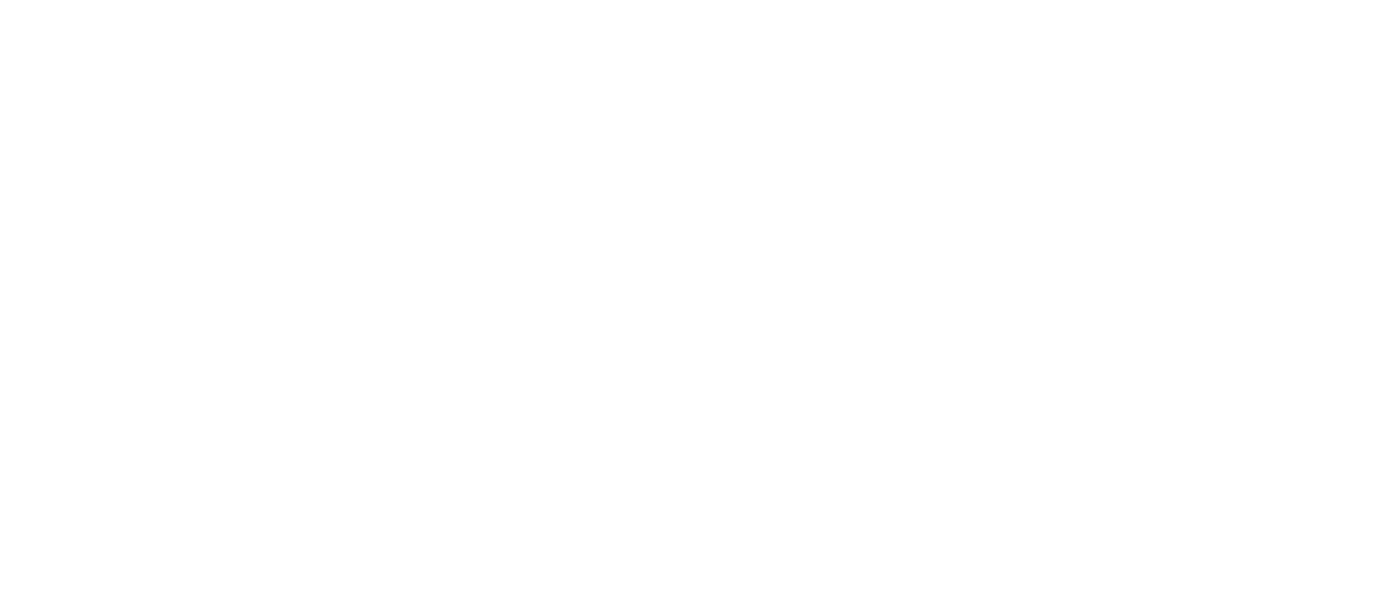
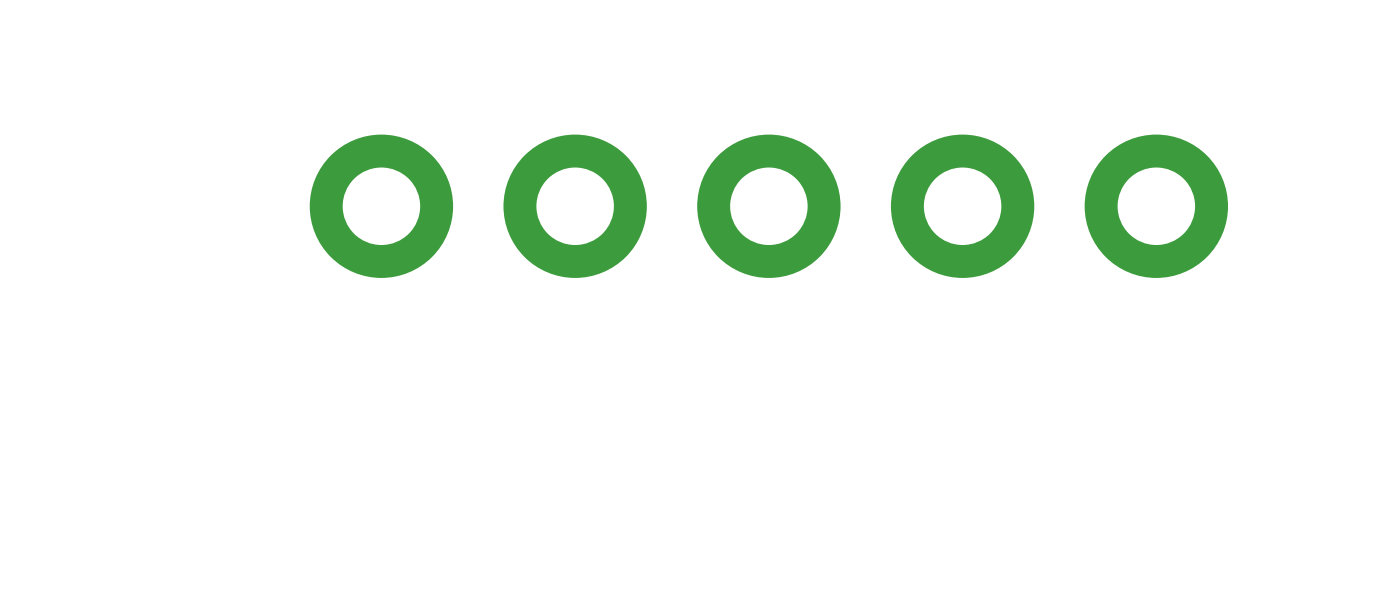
part: none -> (768, 206)

